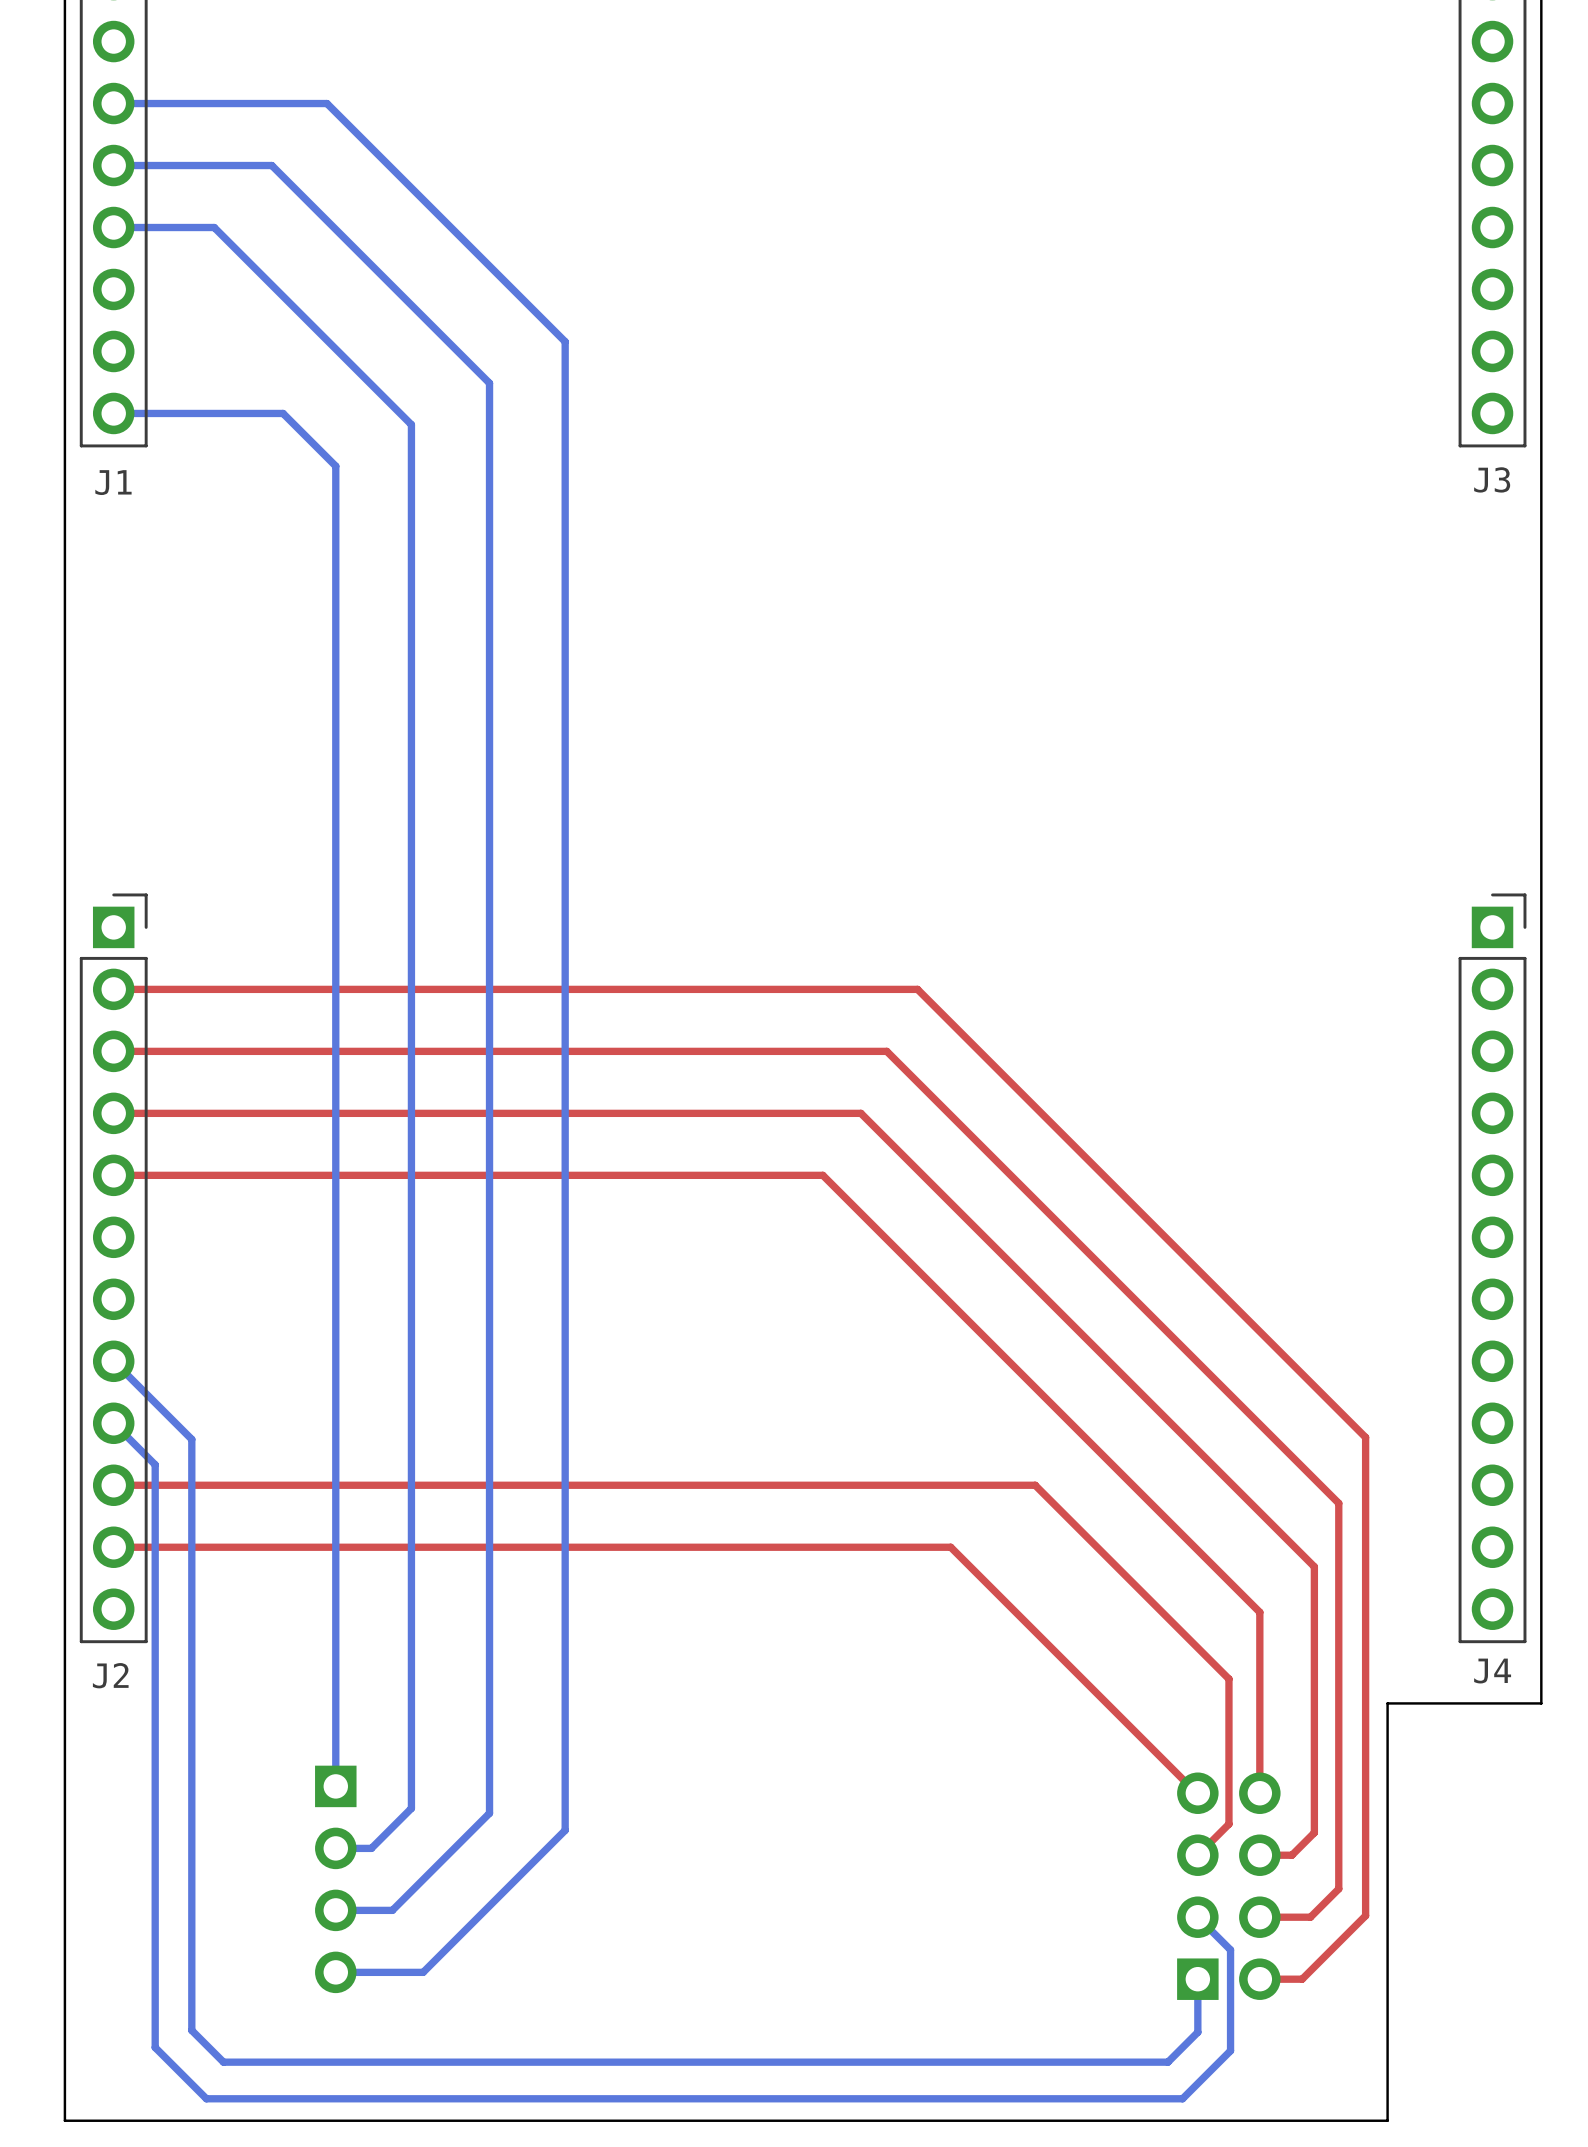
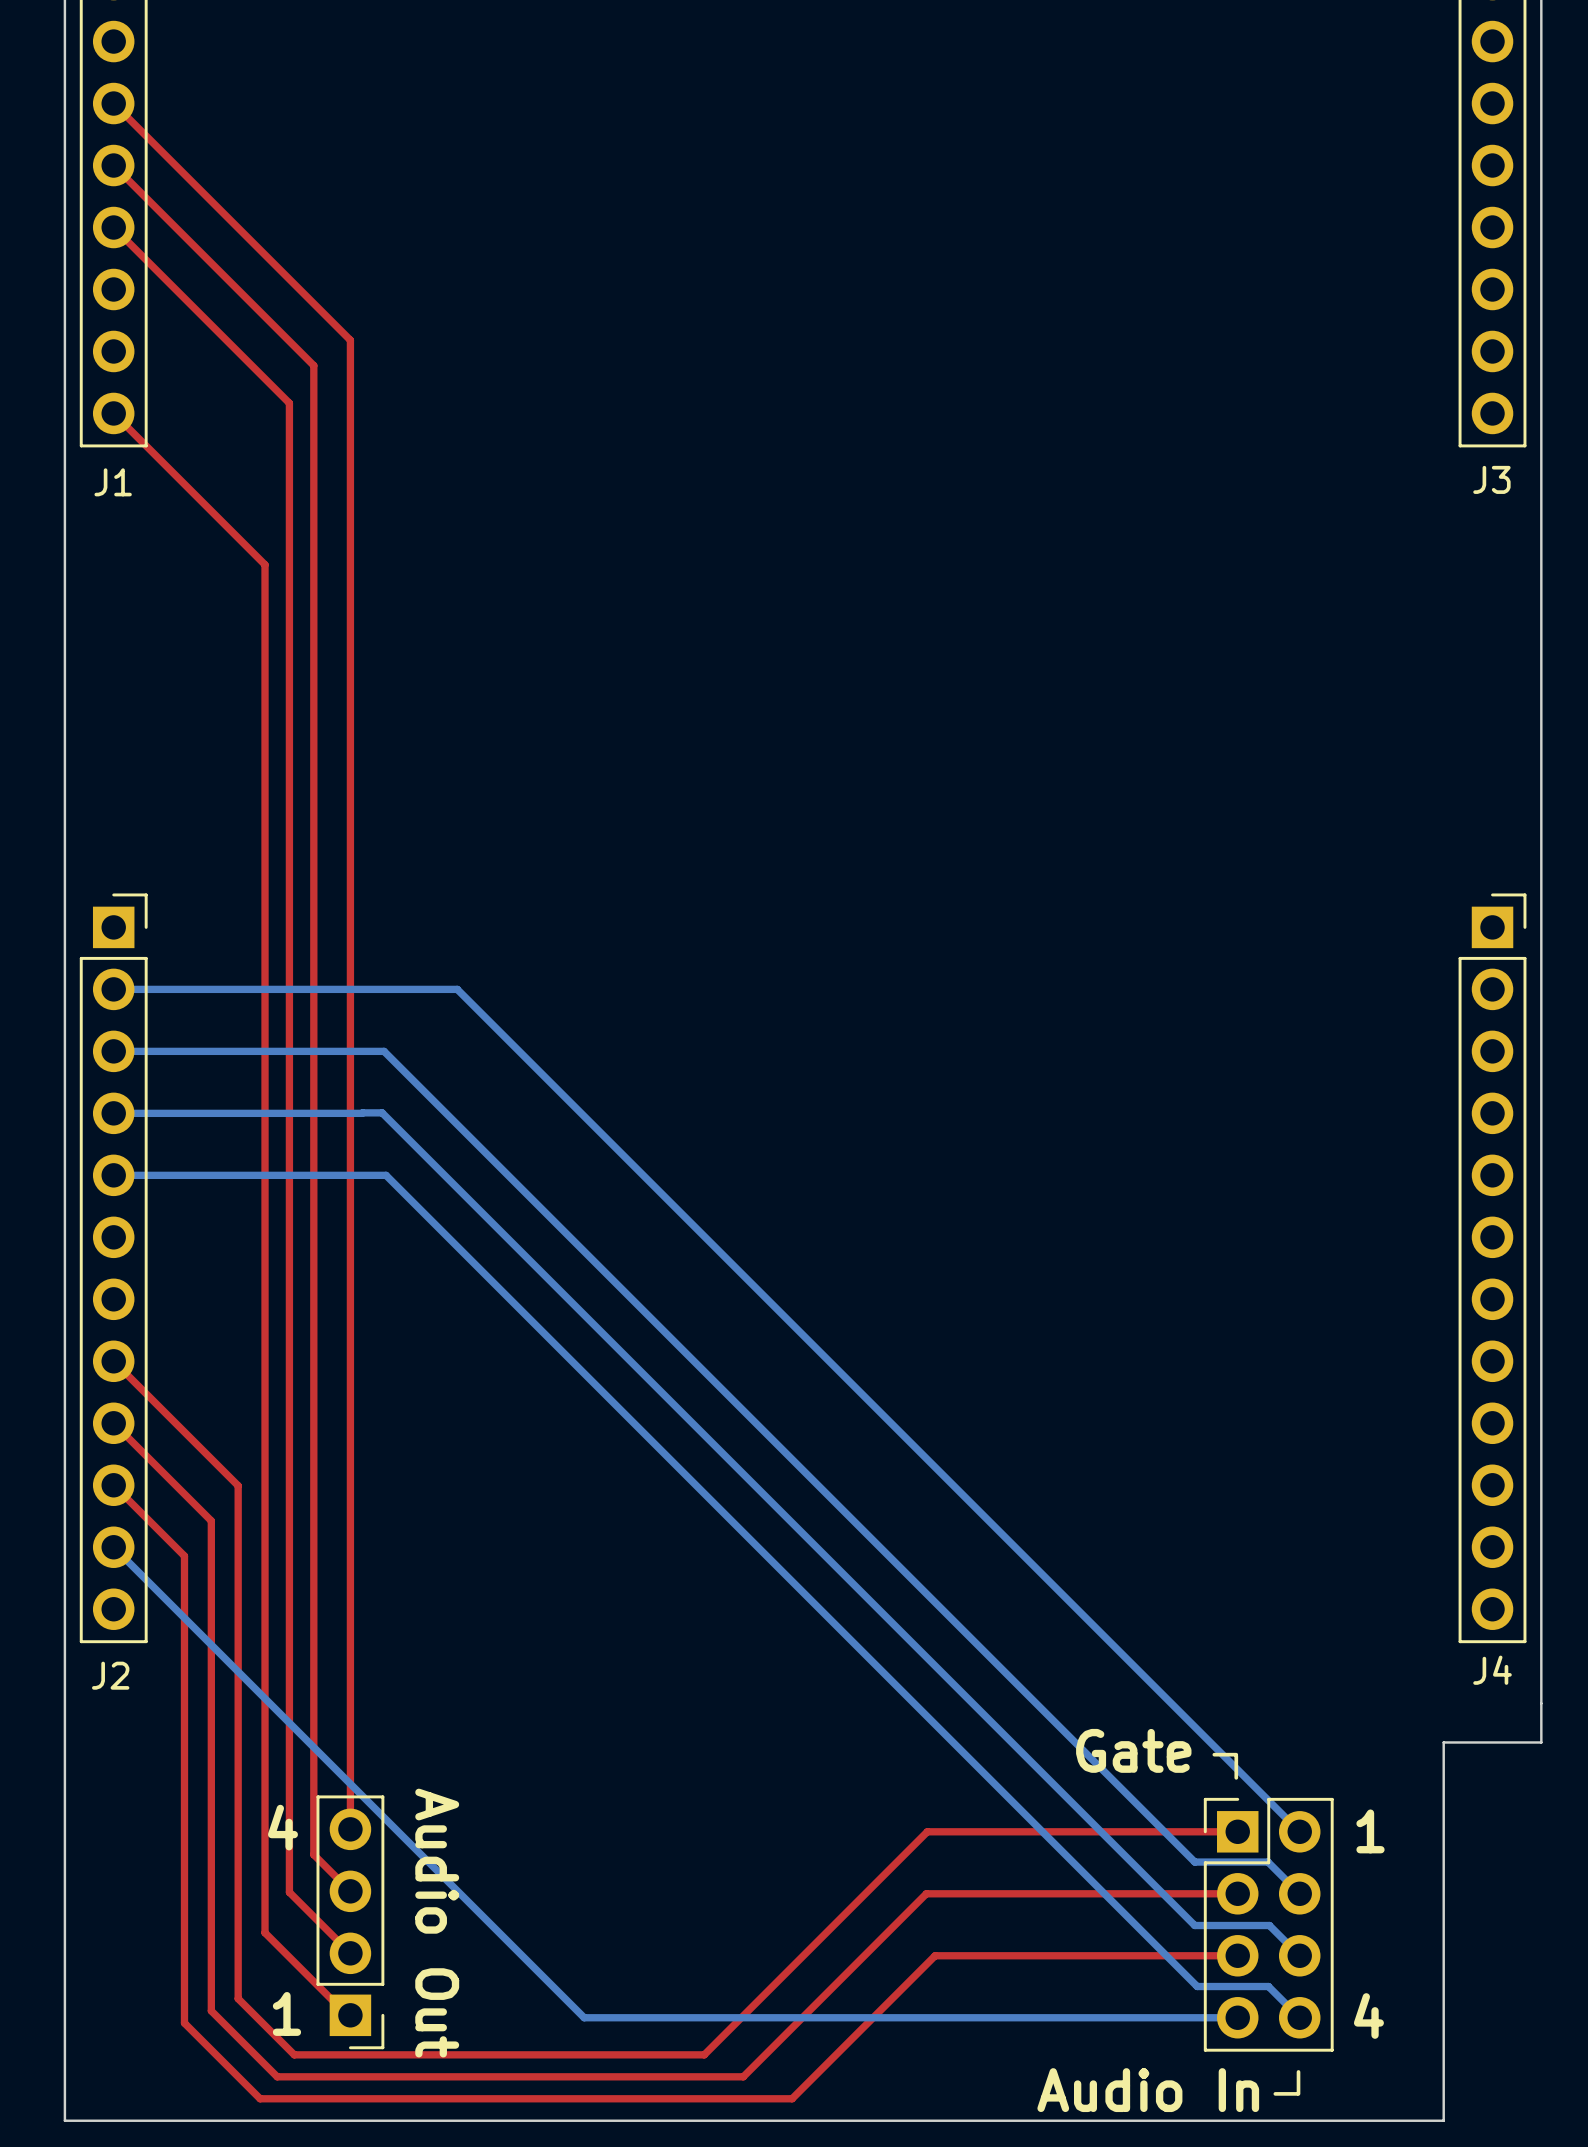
bottom track: (113, 103) (327, 103) (565, 341) (565, 1830) (423, 1972) (335, 1972) -> none
top track: none -> (113, 103) (350, 340) (350, 1829)
bottom track: (113, 165) (271, 165) (489, 383) (489, 1813) (392, 1910) (335, 1910) -> none
top track: none -> (113, 165) (313, 365) (313, 1854) (350, 1891)
bottom track: (113, 227) (214, 227) (411, 424) (411, 1808) (371, 1848) (335, 1848) -> none
top track: none -> (113, 227) (289, 403) (289, 1892) (350, 1953)
bottom track: (113, 413) (283, 413) (335, 466) (335, 1786) -> none
top track: none -> (113, 413) (265, 564) (265, 1932) (347, 2015) (350, 2015)
bottom track: none -> (113, 989) (457, 989) (1299, 1831)
top track: (113, 989) (917, 989) (1365, 1437) (1365, 1915) (1302, 1979) (1259, 1979) -> none
bottom track: none -> (113, 1051) (384, 1051) (1194, 1862) (1268, 1862) (1299, 1893)
top track: (113, 1051) (886, 1051) (1338, 1503) (1338, 1888) (1310, 1917) (1259, 1917) -> none
bottom track: none -> (113, 1113) (382, 1112) (1194, 1925) (1269, 1925) (1299, 1955)
top track: (113, 1113) (860, 1113) (1314, 1566) (1314, 1832) (1291, 1855) (1259, 1855) -> none
bottom track: none -> (113, 1175) (386, 1175) (1197, 1986) (1268, 1986) (1299, 2017)
top track: (113, 1175) (822, 1175) (1259, 1612) (1259, 1793) -> none
bottom track: (113, 1361) (191, 1439) (191, 2030) (223, 2062) (1167, 2062) (1197, 2032) (1197, 1979) -> none
top track: none -> (113, 1361) (238, 1485) (238, 1998) (294, 2054) (704, 2054) (927, 1831) (1237, 1831)
bottom track: (113, 1423) (155, 1464) (155, 2047) (206, 2098) (1182, 2098) (1230, 2050) (1230, 1949) (1197, 1917) -> none
top track: none -> (113, 1423) (211, 1520) (211, 2010) (277, 2076) (743, 2076) (926, 1893) (1237, 1893)
top track: (113, 1485) (1035, 1485) (1228, 1679) (1228, 1824) (1197, 1855) -> (113, 1485) (184, 1556) (184, 2023) (260, 2098) (792, 2098) (935, 1955) (1237, 1955)
bottom track: none -> (113, 1547) (584, 2017) (1237, 2017)
top track: (113, 1547) (950, 1547) (1197, 1793) -> none
board edge: (1541, 1703) (1387, 1703) (1387, 2120) -> (1541, 1703) (1541, 1742) (1443, 1742) (1443, 2120) (1387, 2120)
text: none -> Gate (1133, 1750)
line: none -> (1236, 1754) (1214, 1754)
line: none -> (1236, 1755) (1236, 1777)
text: none -> 4 (282, 1827)
text: none -> 1 (1370, 1831)
part side: top (335, 1879) -> bottom (350, 1922)
part side: top (1228, 1886) -> bottom (1268, 1924)
text: none -> Audio Out (437, 1923)
text: none -> 1 (286, 2013)
text: none -> 4 (1368, 2016)
line: none -> (1298, 2071) (1298, 2093)
text: none -> Audio In (1148, 2090)
line: none -> (1297, 2093) (1275, 2093)

